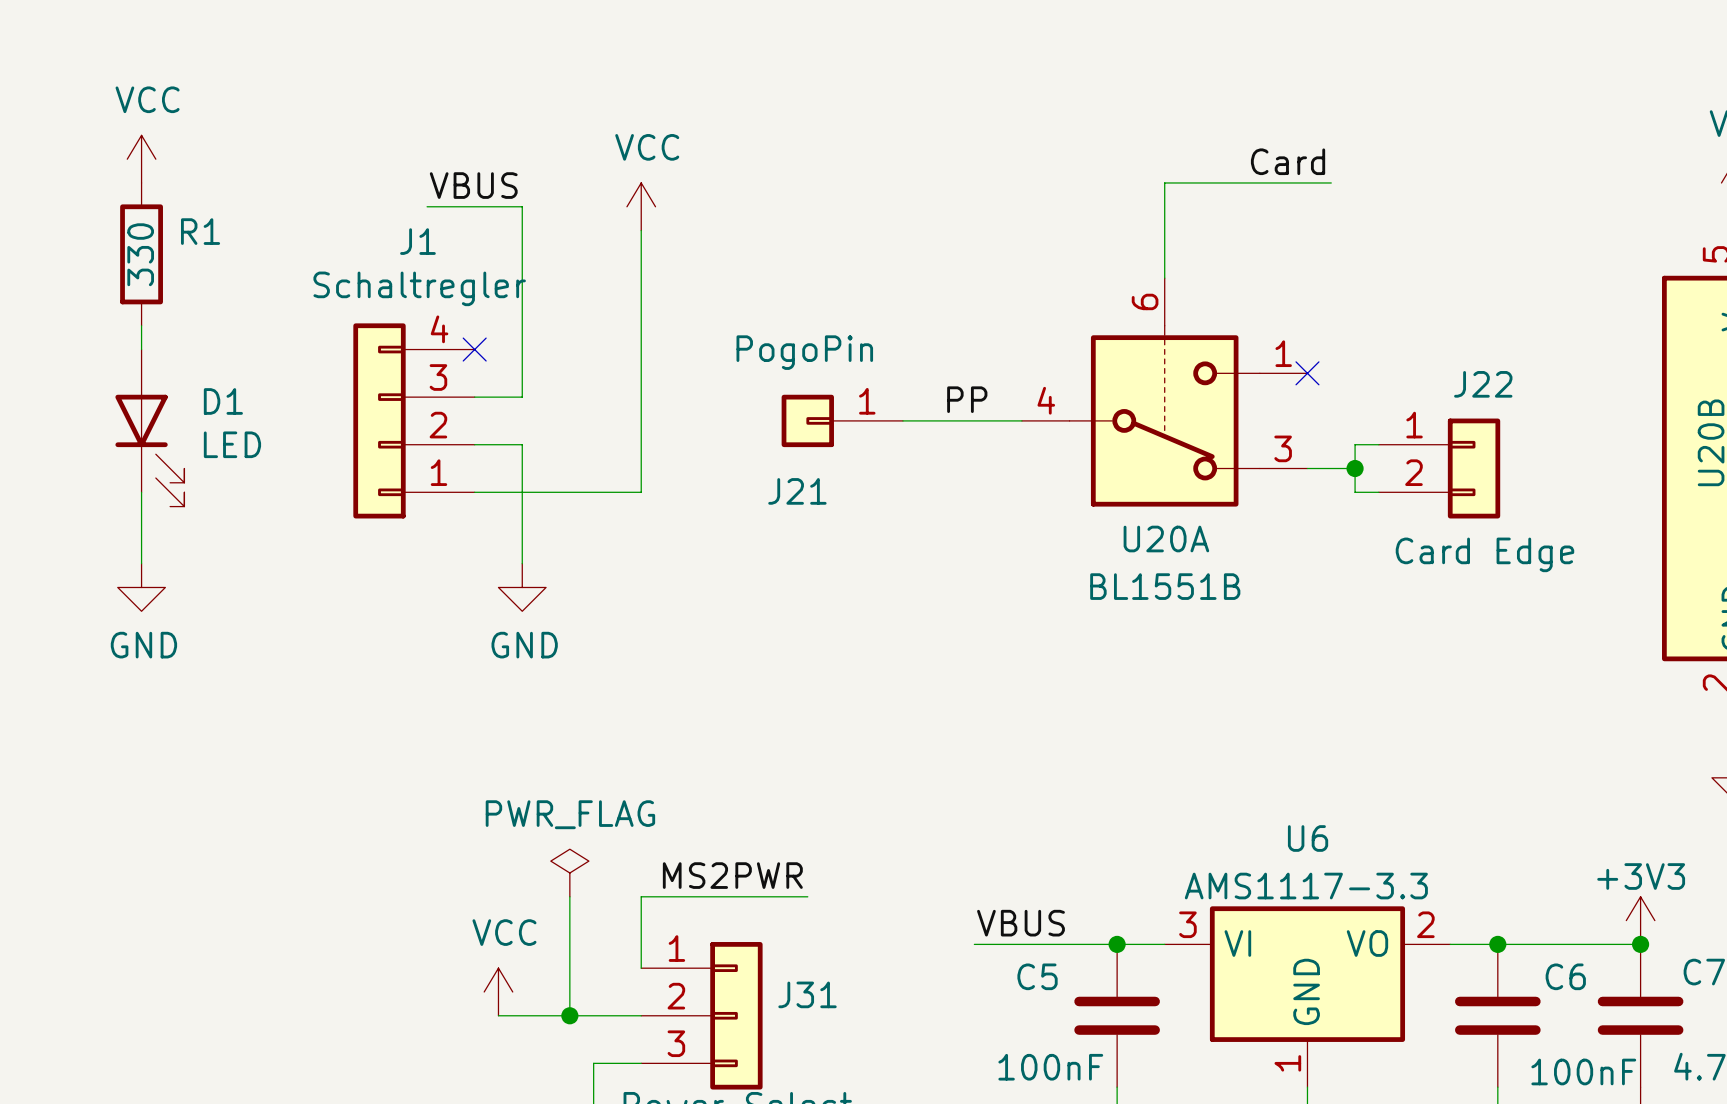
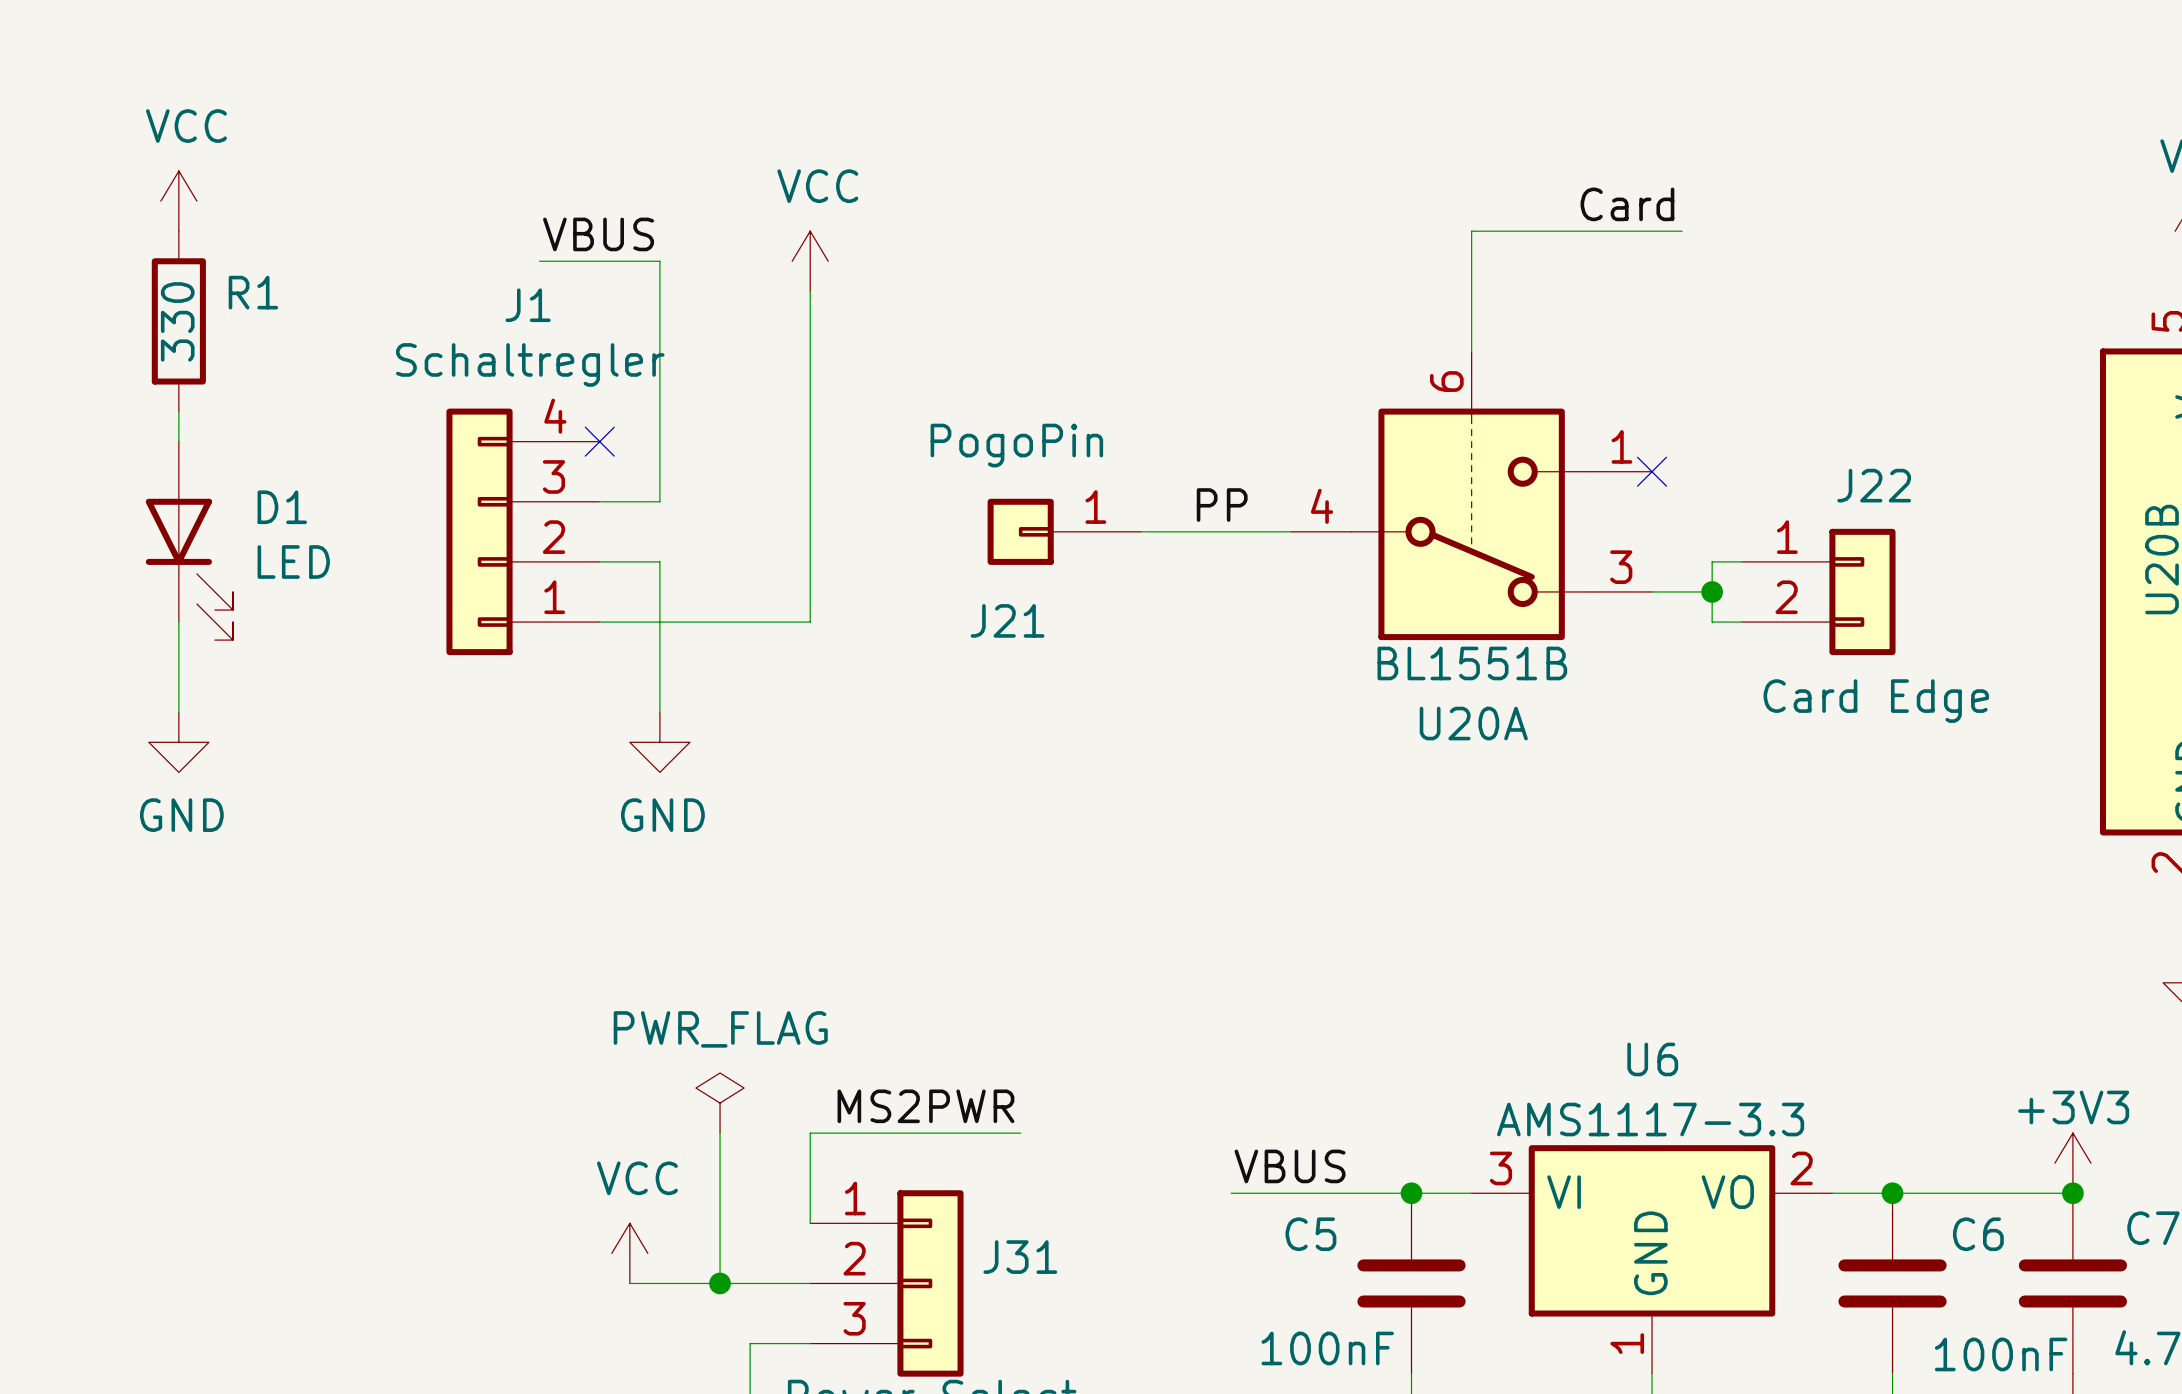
U20A symbol: [1021, 278, 1308, 507] -> [1291, 351, 1653, 641]
U20A name position: U20A (1166, 539) -> U20A (1473, 723)
U20A value position: BL1551B (1165, 586) -> BL1551B (1472, 663)

